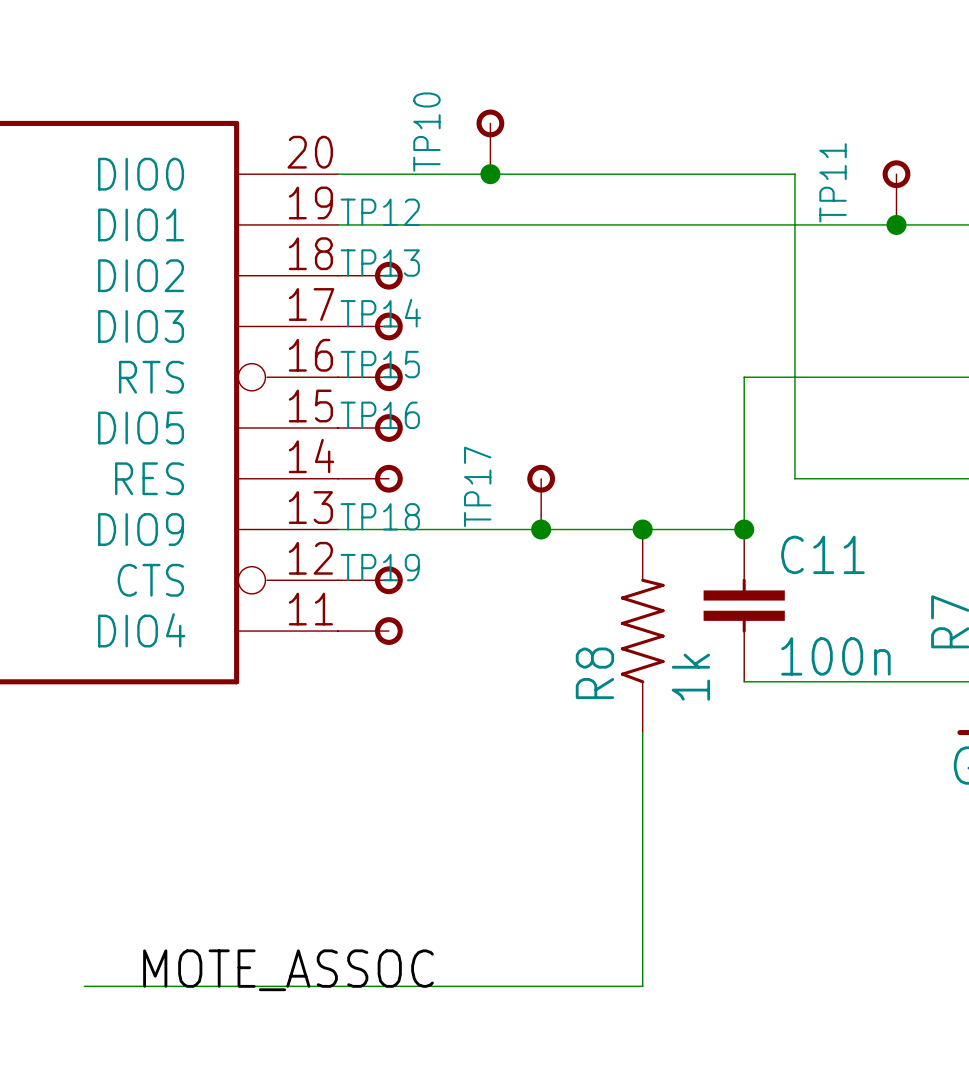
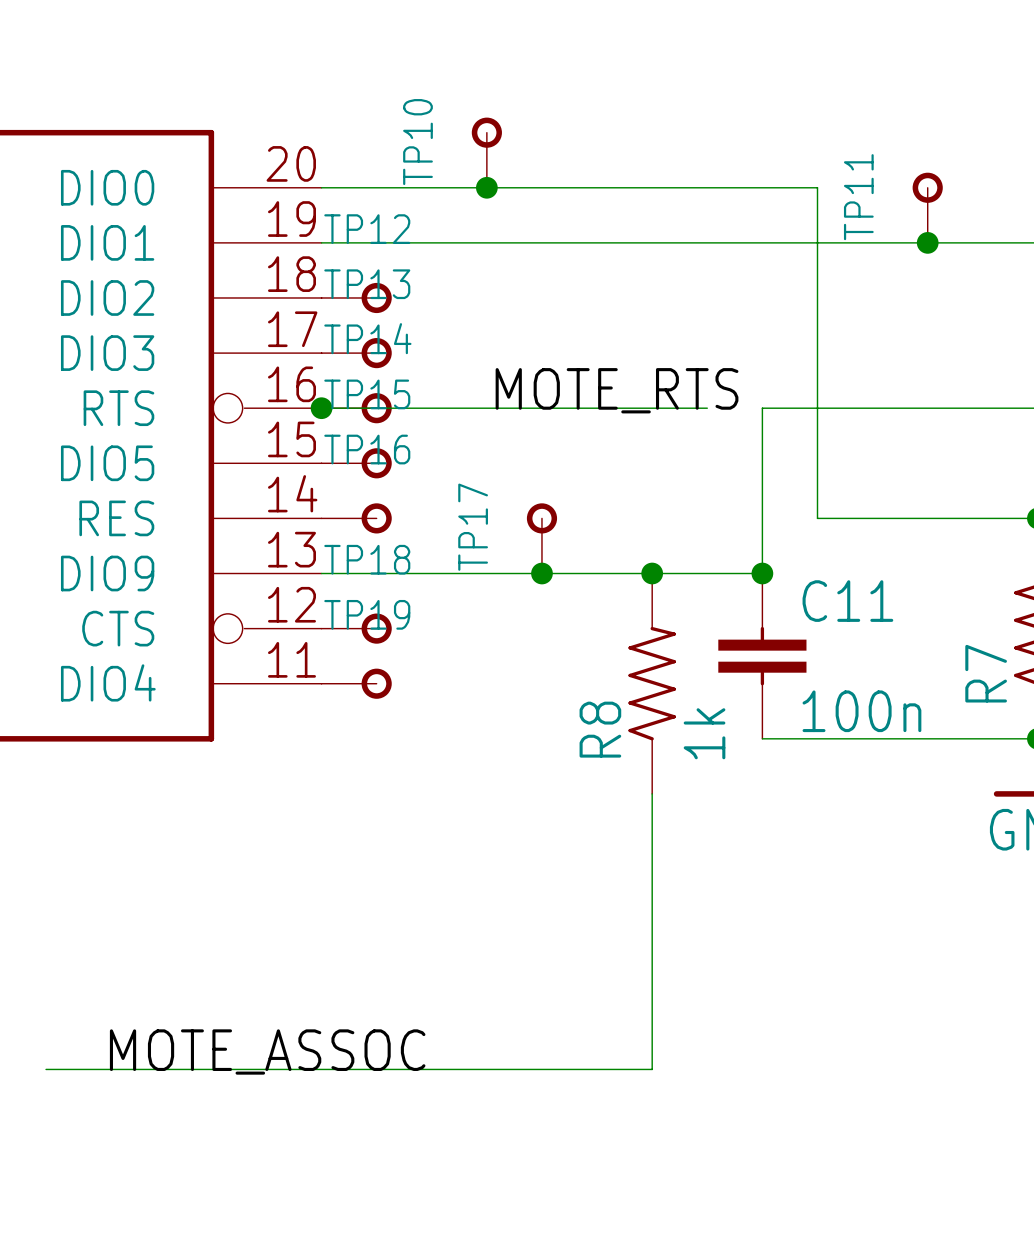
label: none -> MOTE_RTS (617, 390)
wire: none -> (321, 408) (707, 408)
junction: none -> (321, 408)

